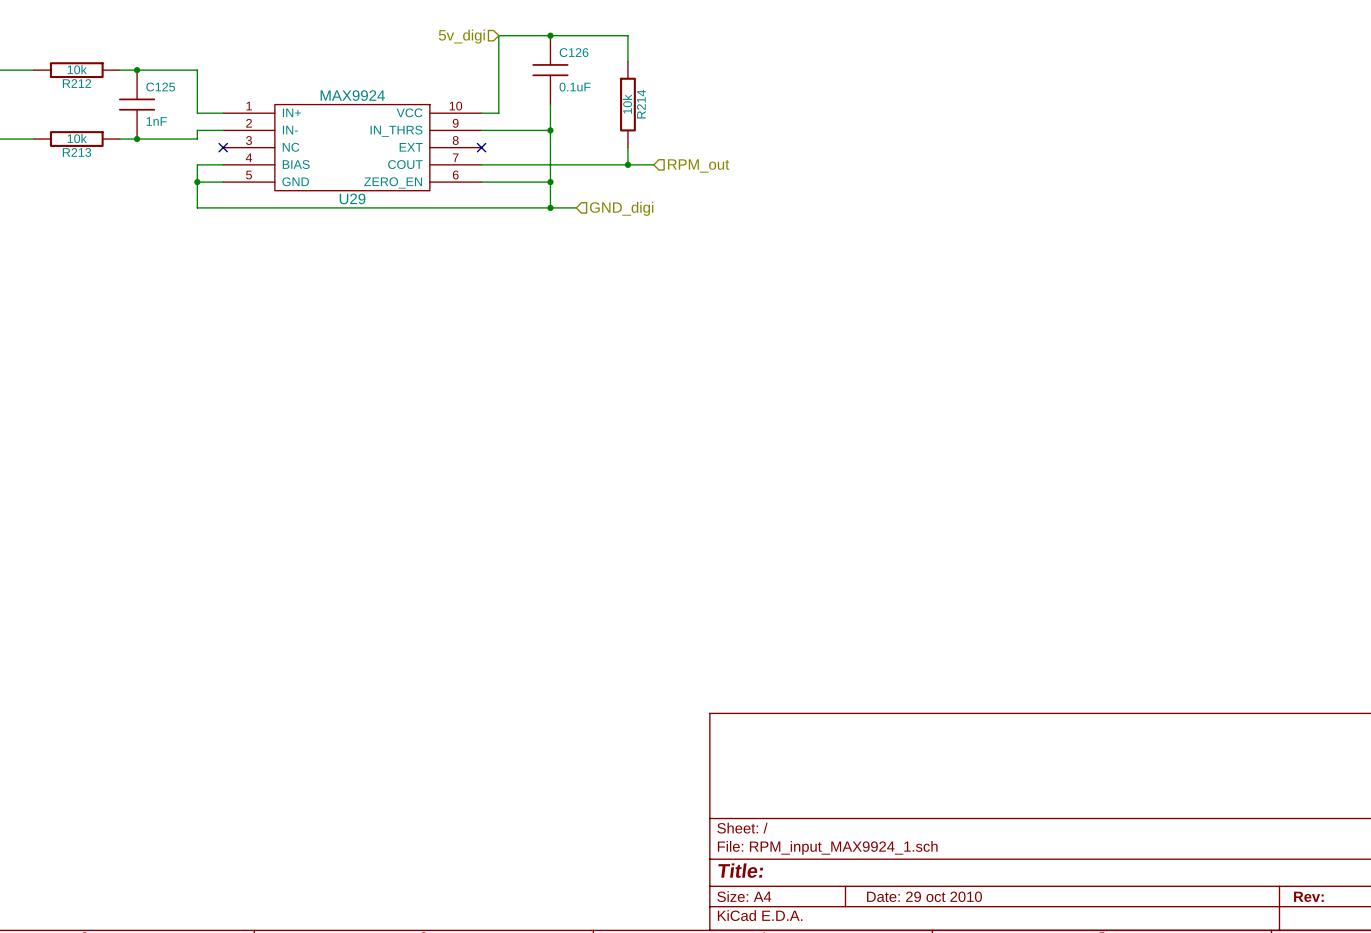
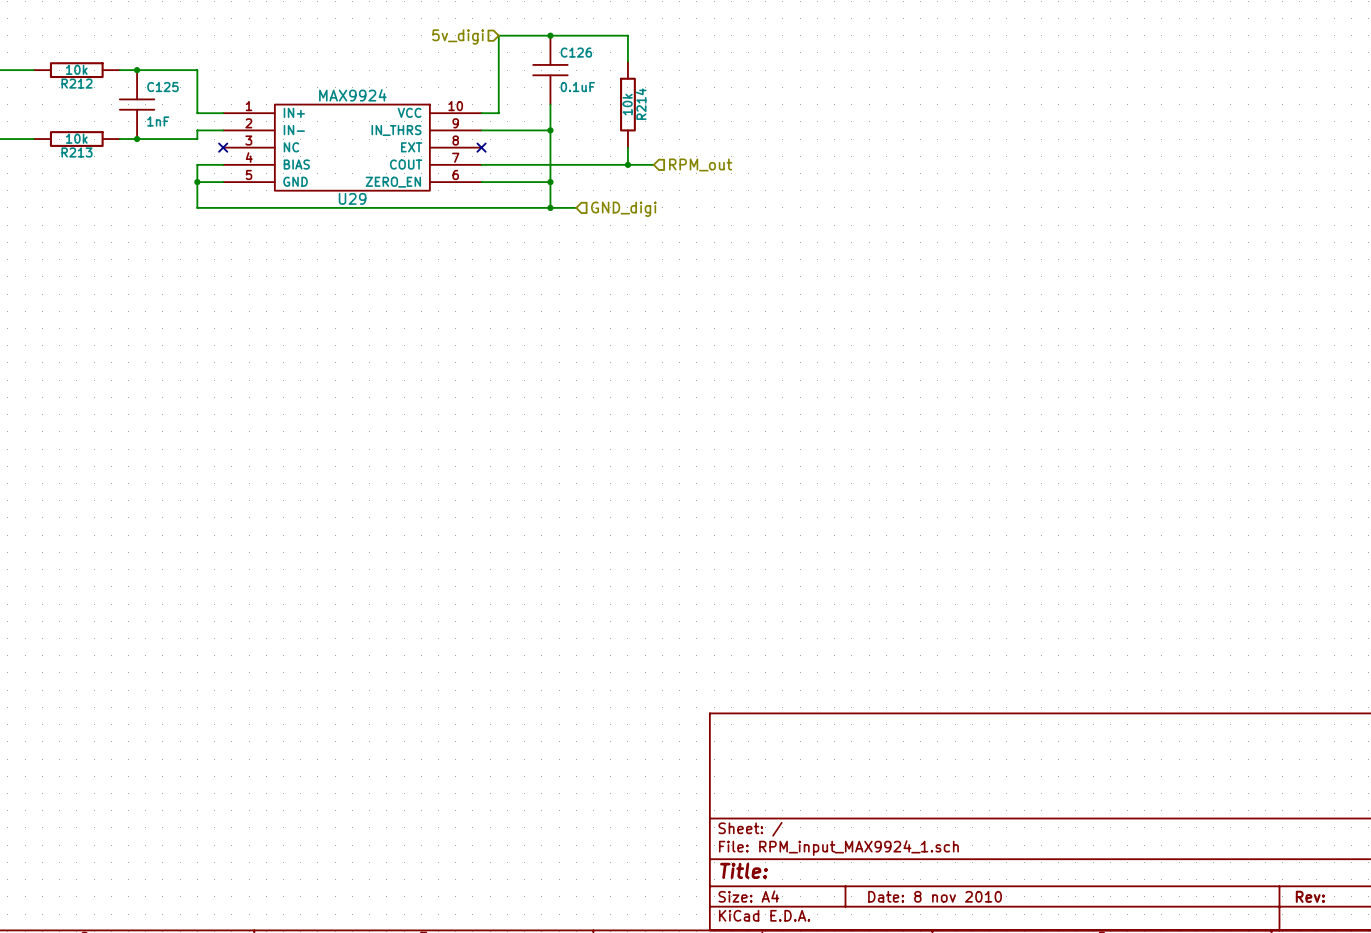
title block: Date: 29 oct 2010 (924, 896) -> Date: 8 nov 2010 (935, 896)

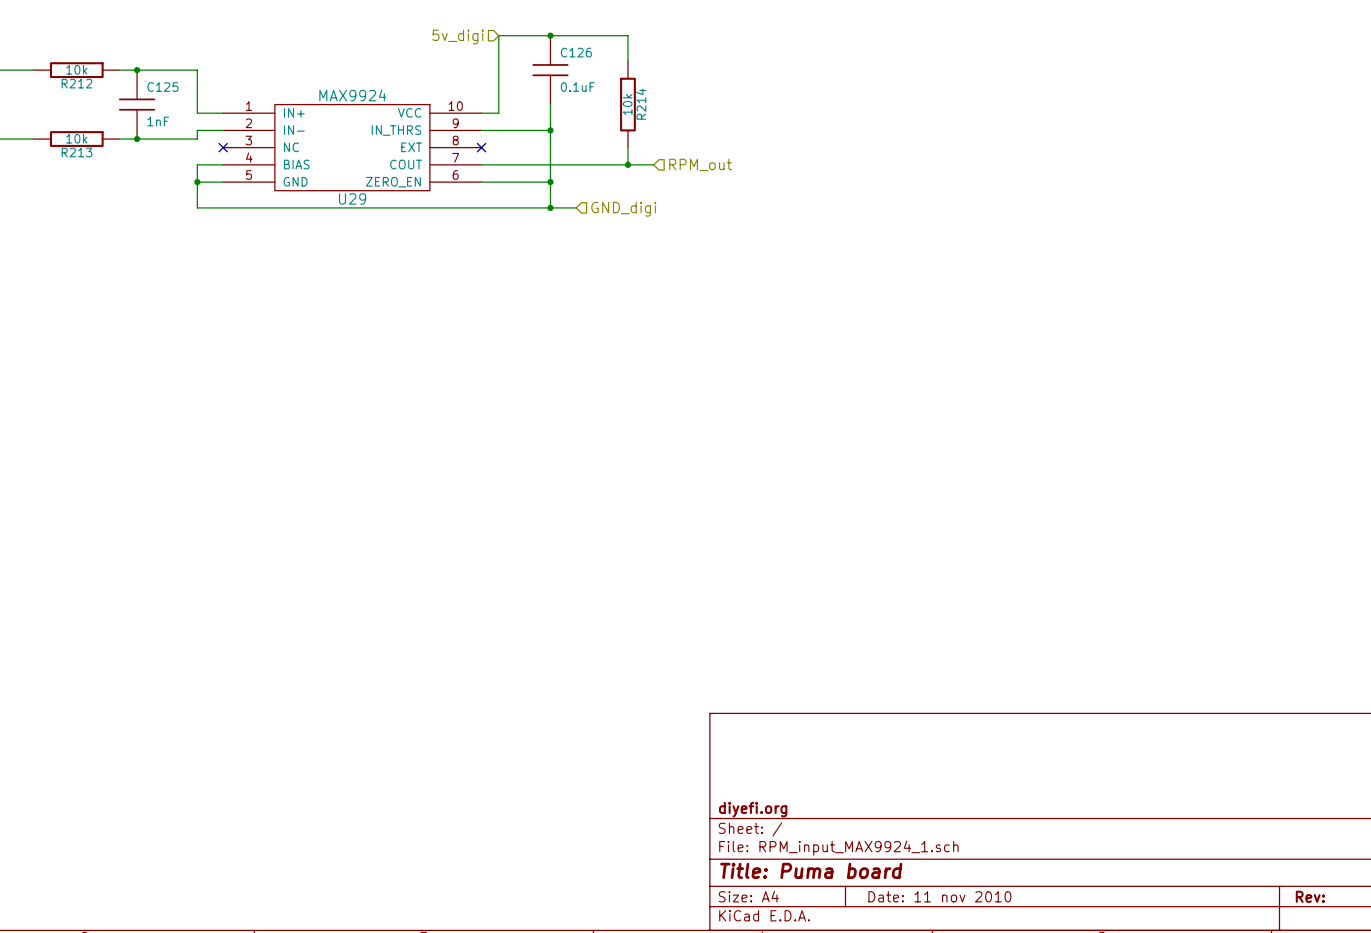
title block: none -> diyefi.org (753, 809)
title block: Title: (743, 870) -> Title: Puma board (811, 870)
title block: Date: 8 nov 2010 (935, 896) -> Date: 11 nov 2010 (939, 896)

